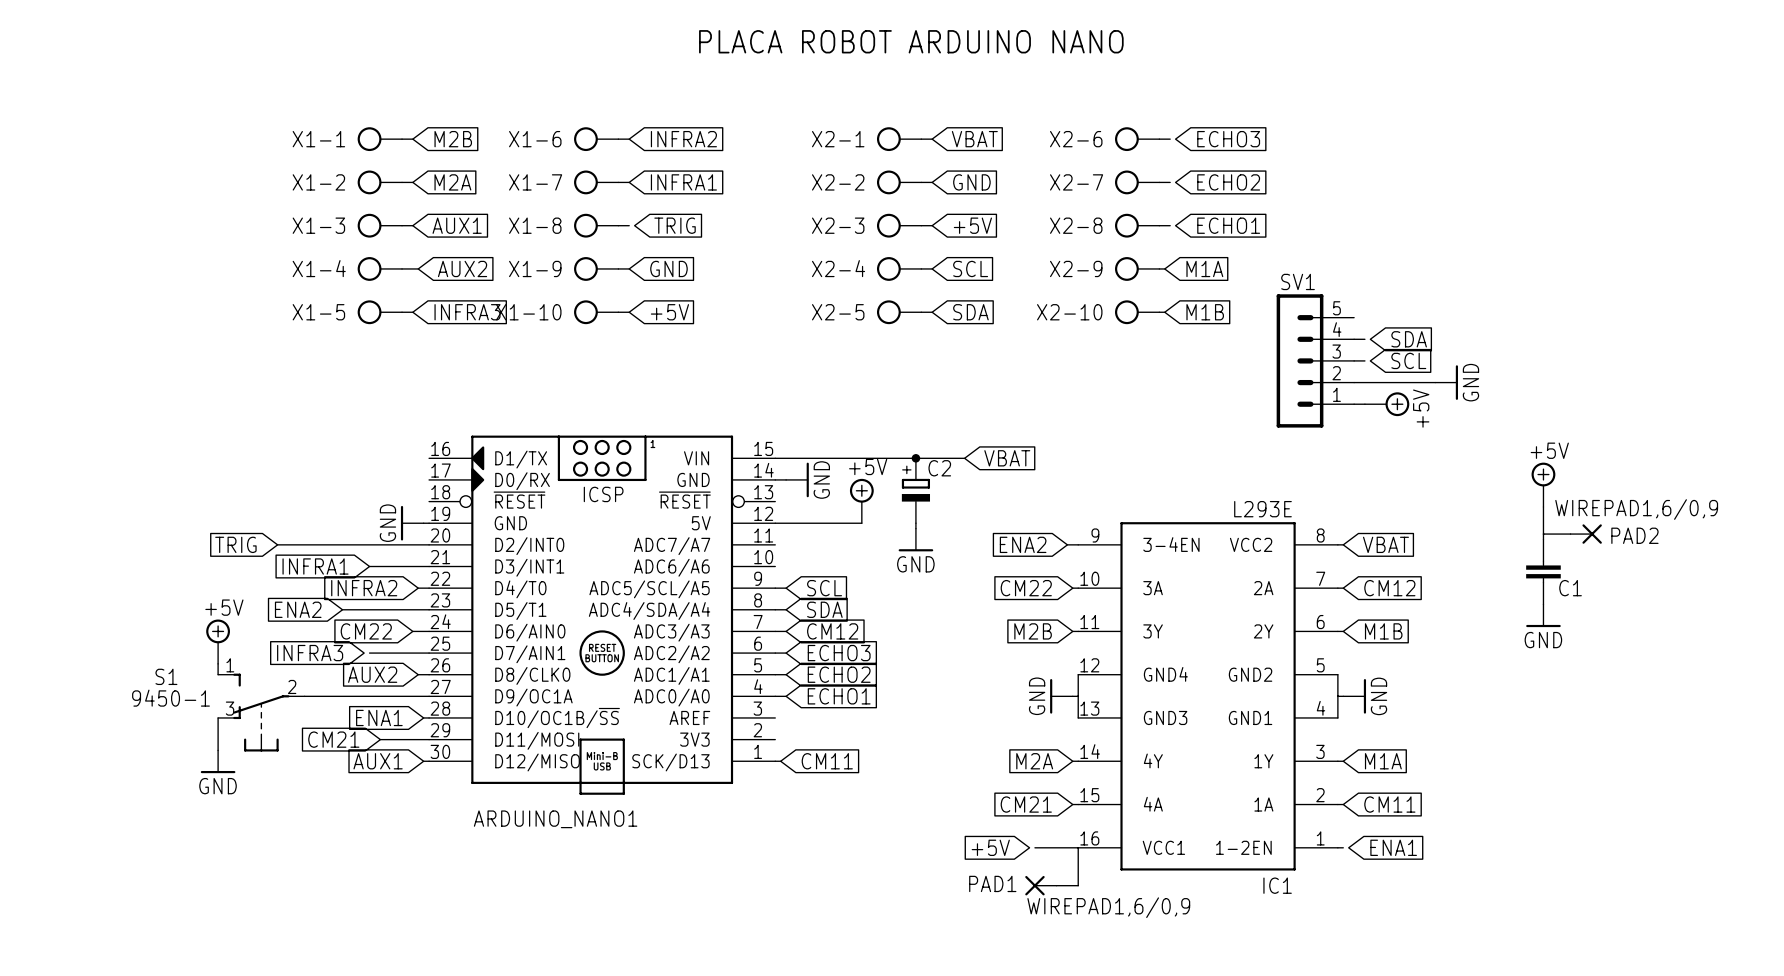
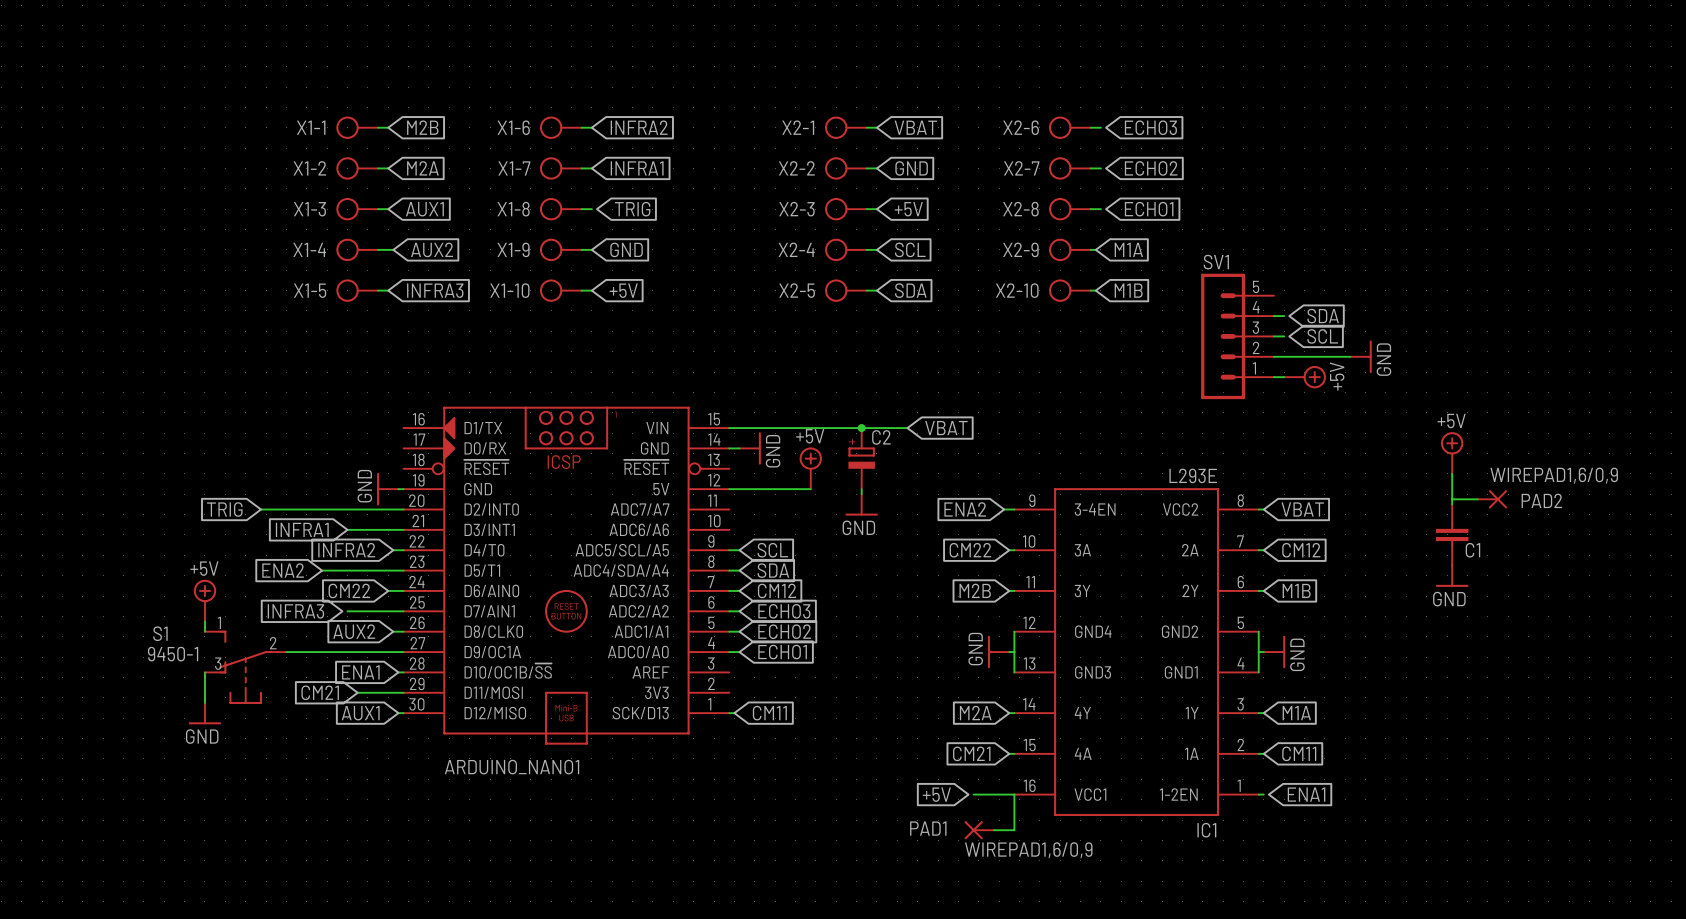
text: PLACA ROBOT ARDUINO NANO (911, 41) -> none

